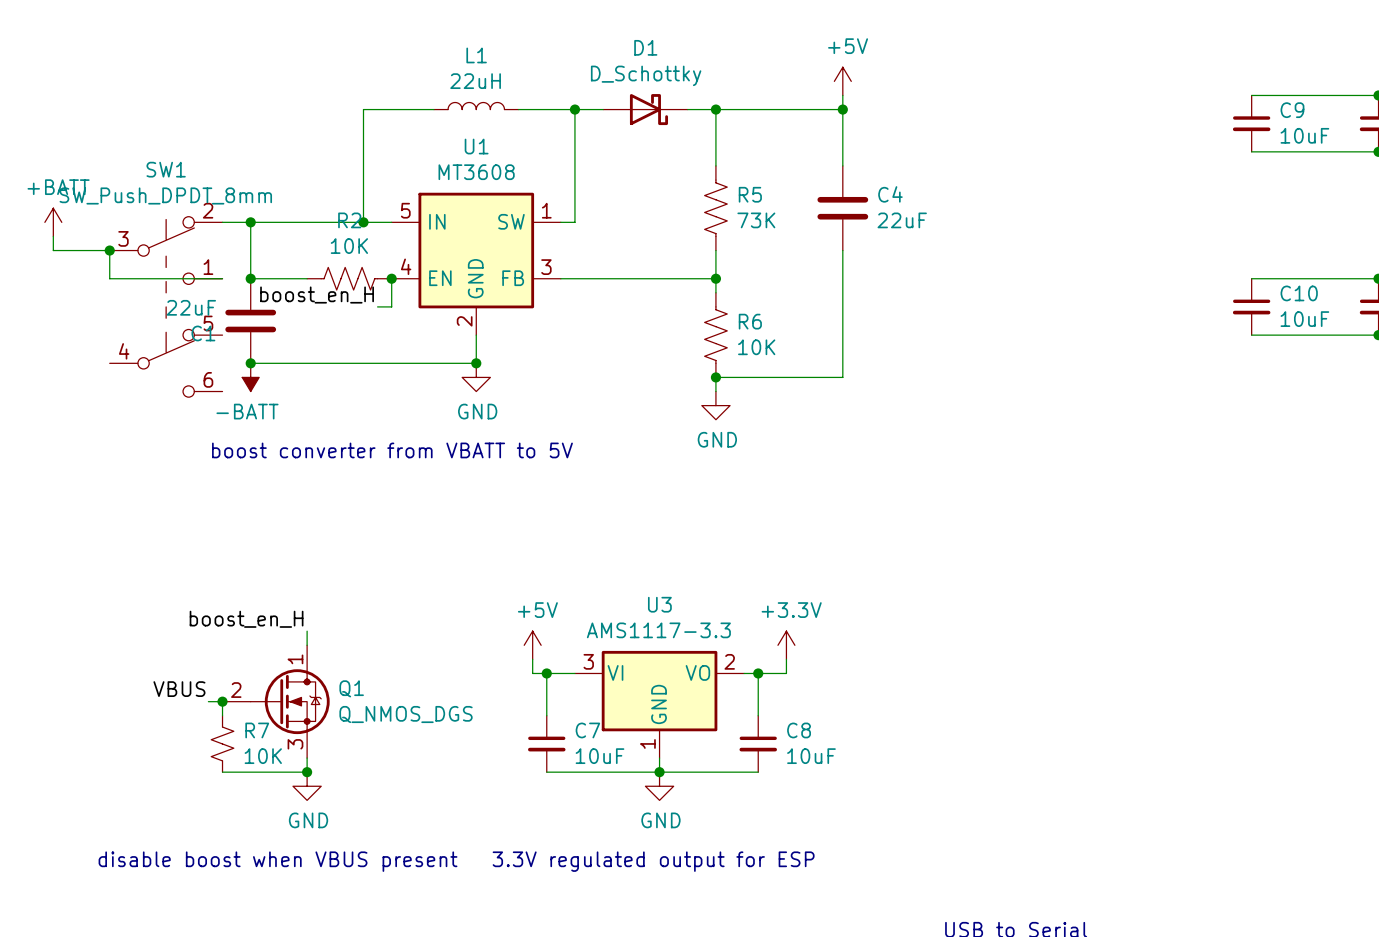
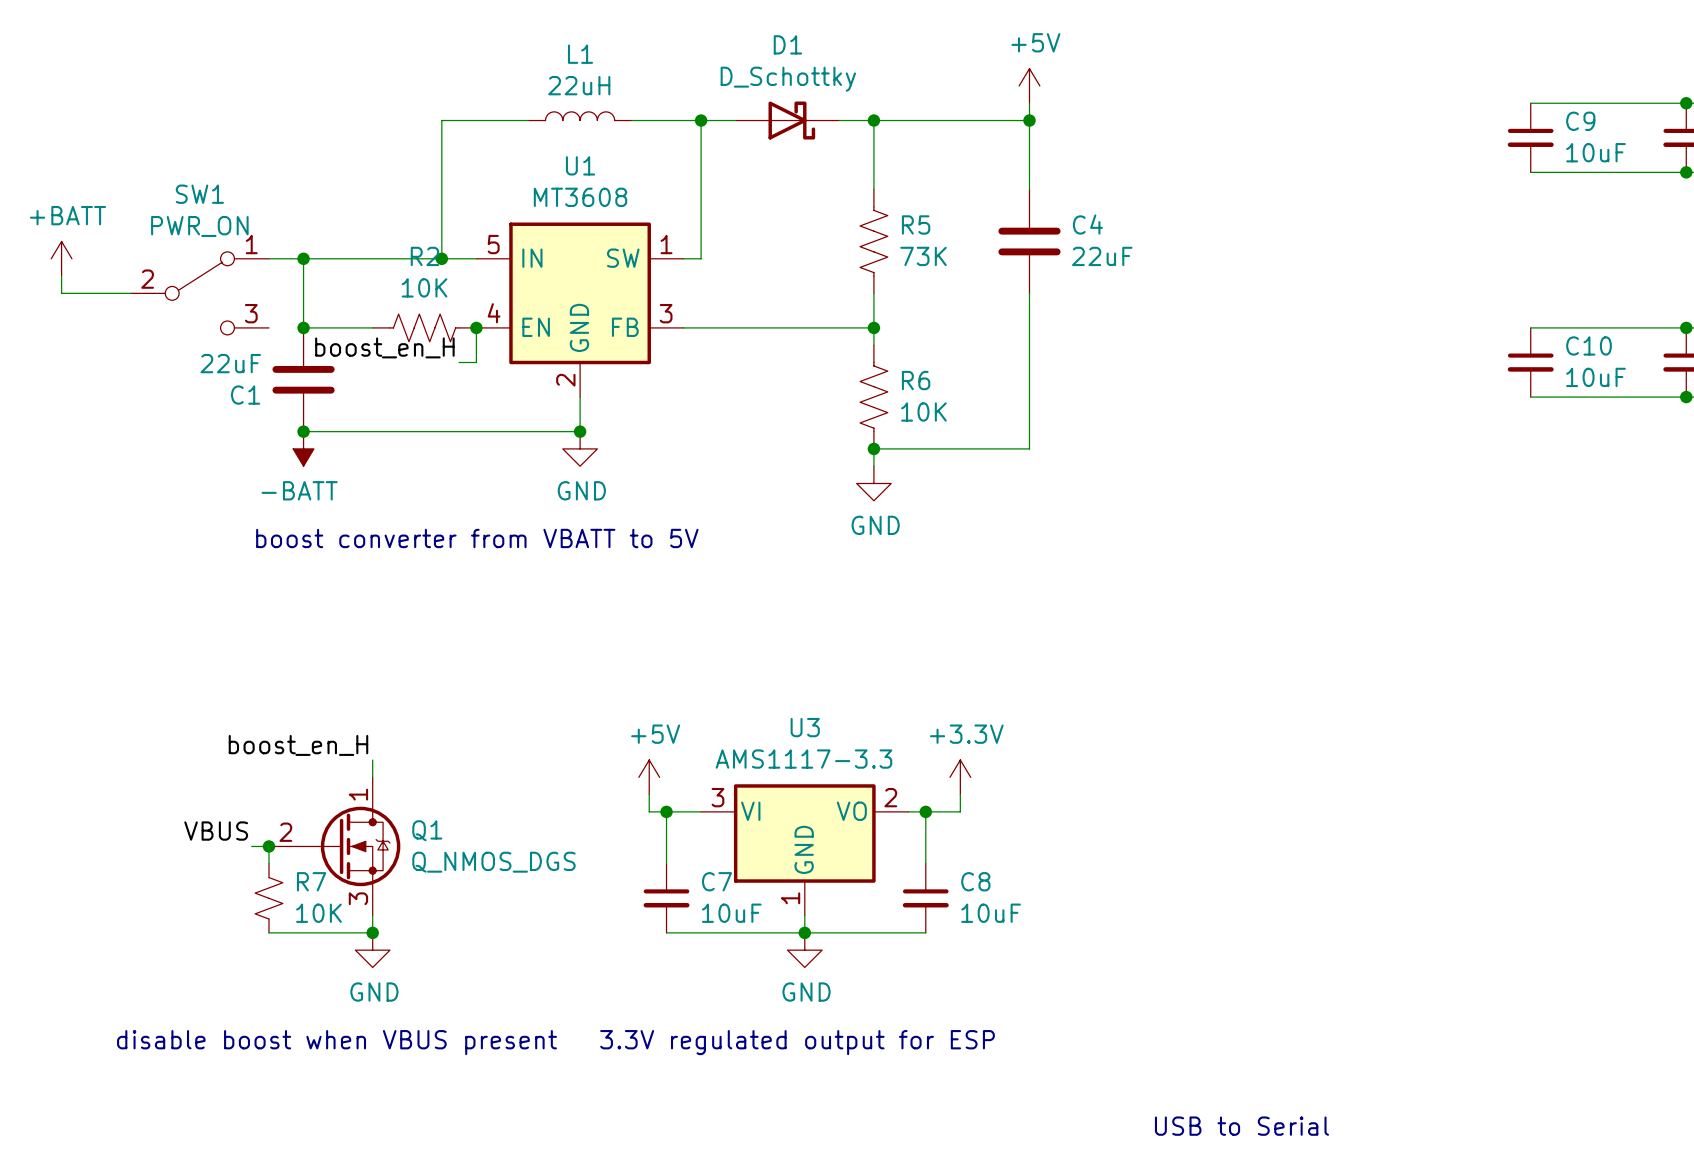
SW1 value: SW_Push_DPDT_8mm (165, 195) -> PWR_ON (199, 226)
SW1 symbol: [109, 216, 223, 398] -> [130, 251, 269, 335]
wire: (109, 250) (109, 278) (222, 278) -> none
junction: (109, 250) -> none

